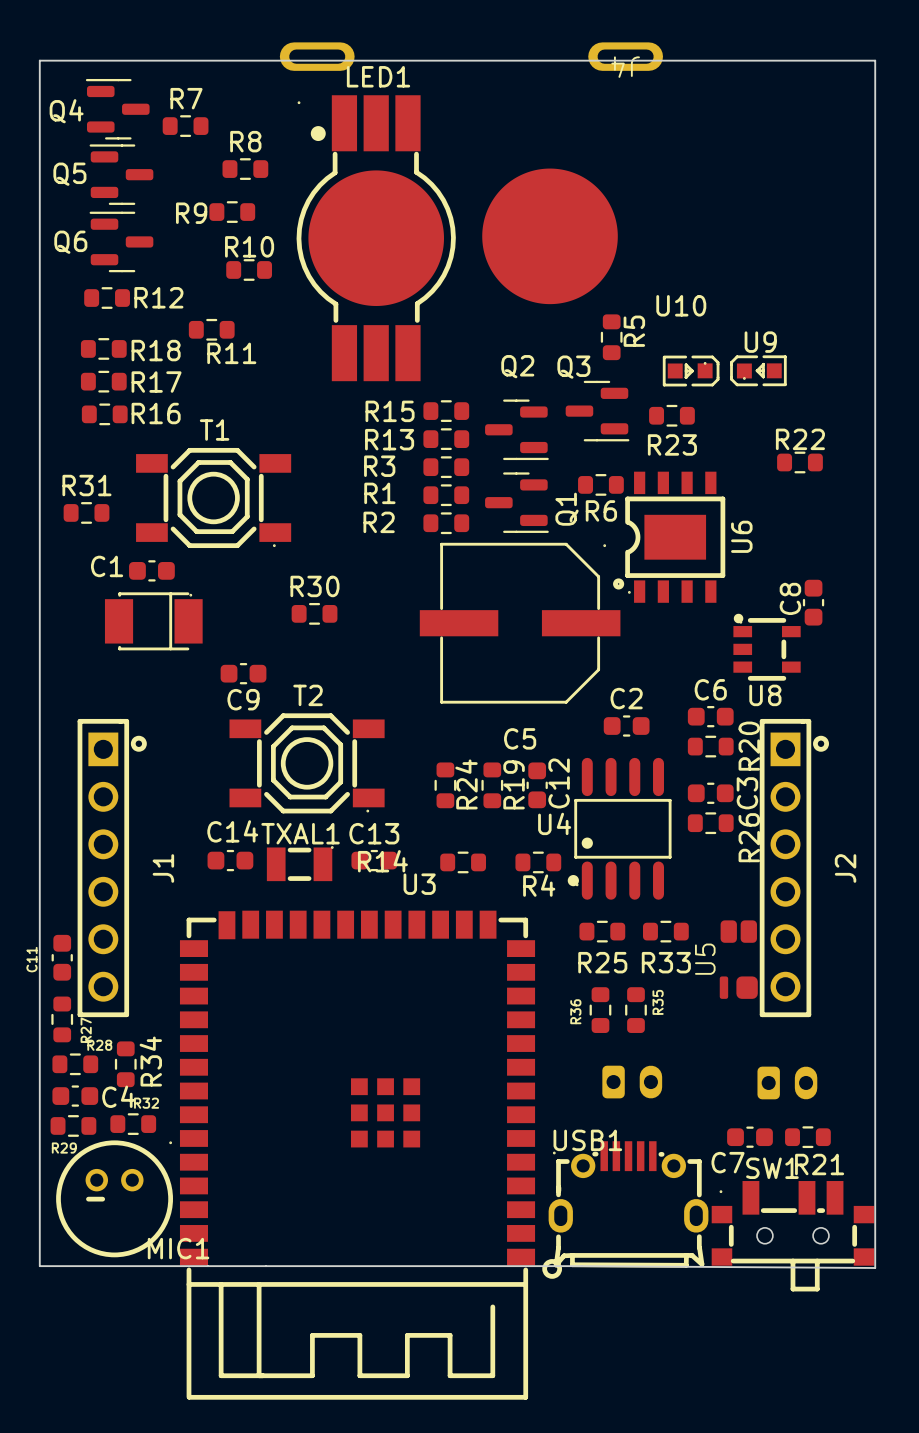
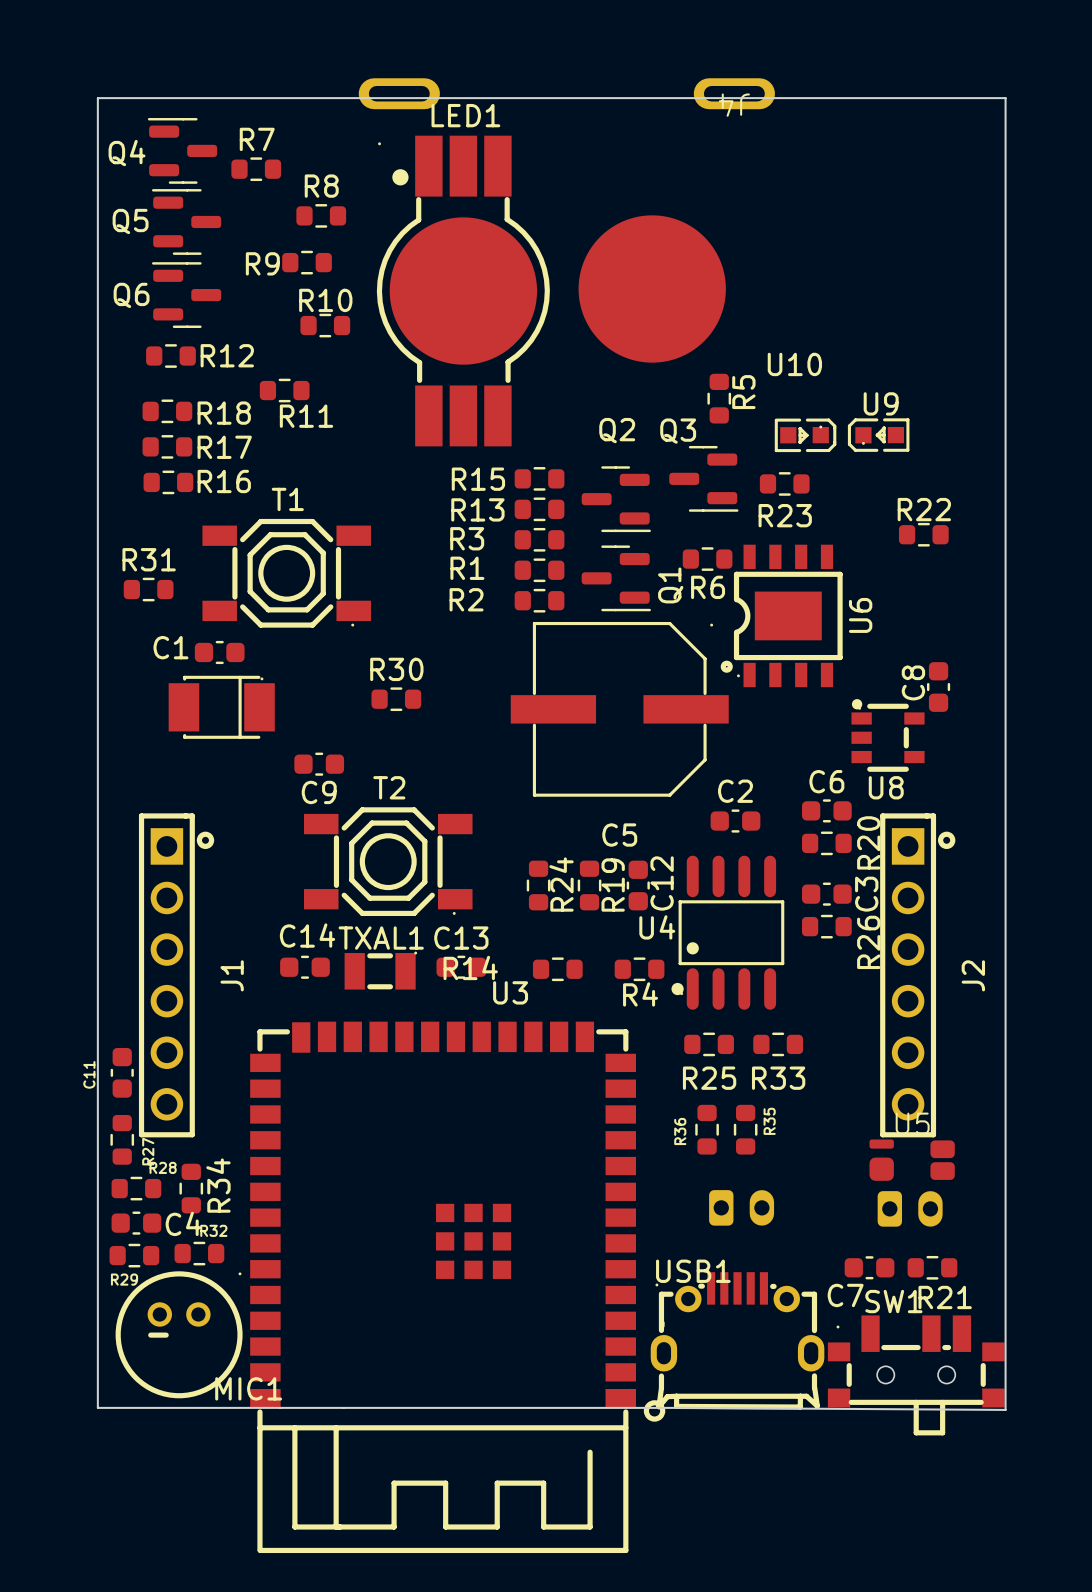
U5 rotation: 0° (738, 959) -> 90° clockwise (912, 1160)
U5 position: (738, 959) -> (912, 1160)

